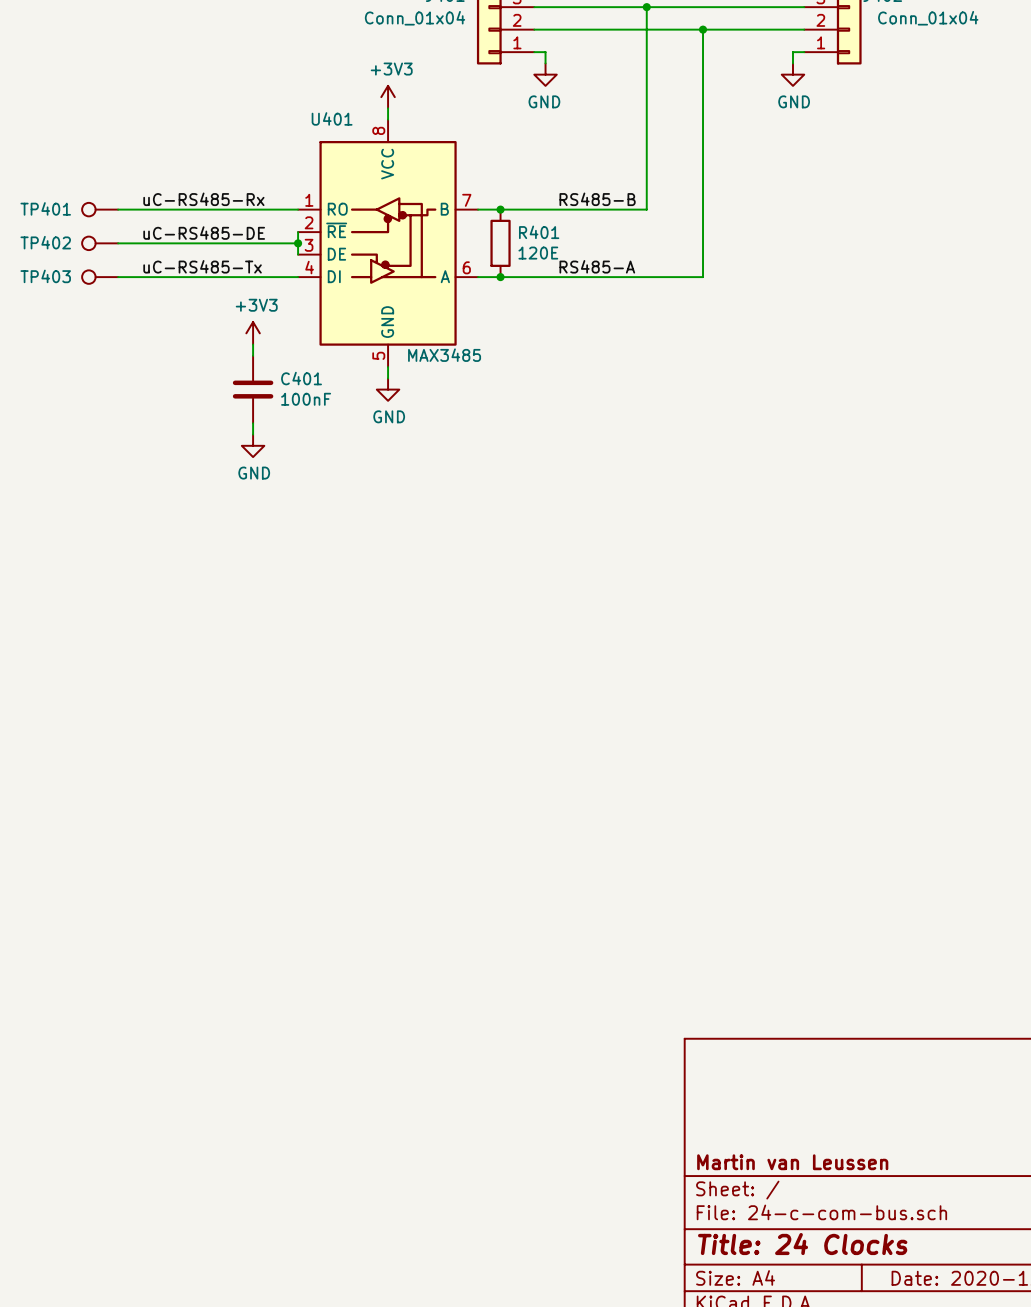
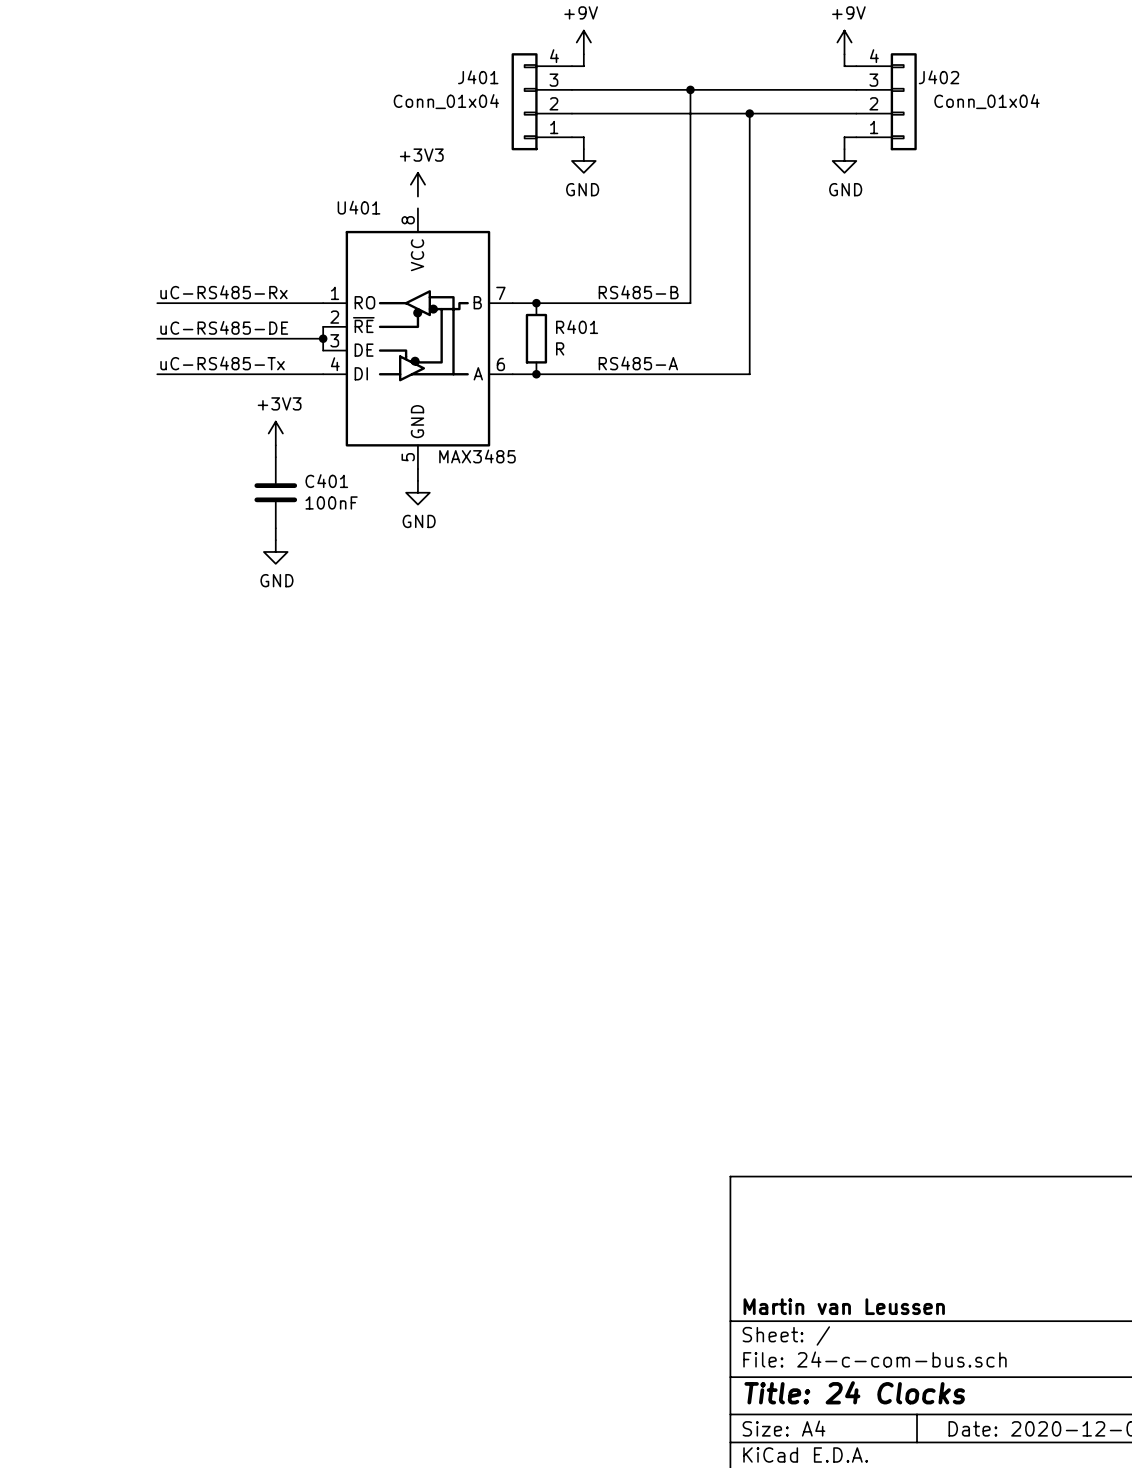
wire: (388, 108) (388, 119) -> none
TP401: (100, 209) -> none
wire: (118, 209) (140, 209) -> none
TP402: (100, 243) -> none
wire: (118, 243) (140, 243) -> none
R401 value: 120E (538, 253) -> R (560, 348)
TP403: (100, 277) -> none
wire: (118, 277) (140, 277) -> none

